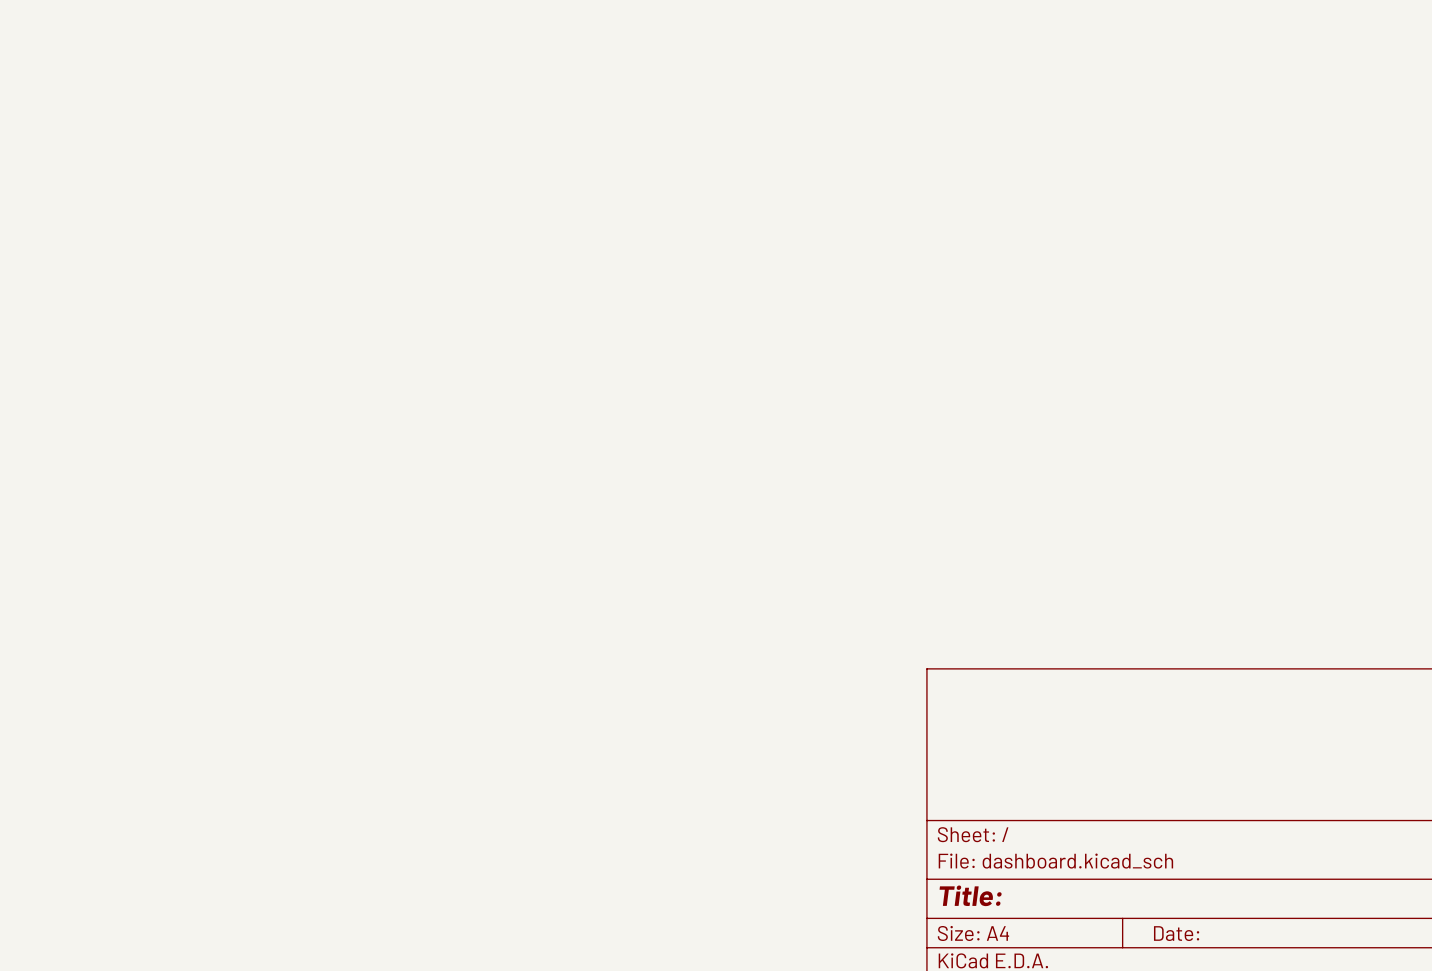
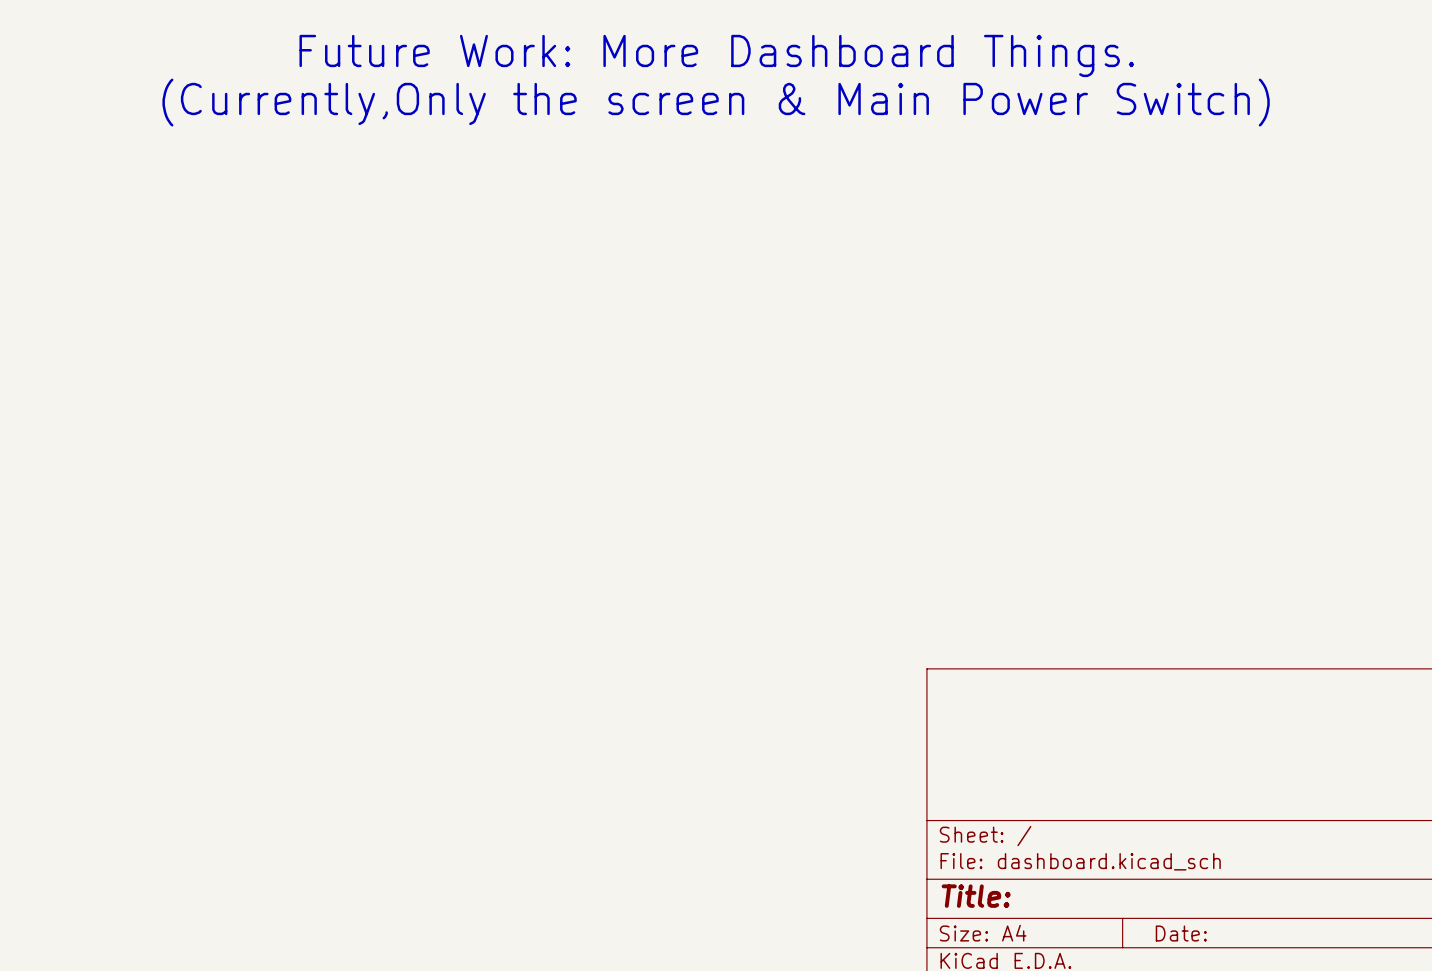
text: none -> Future Work: More Dashboard Things. (716, 55)
text: none -> (Currently,Only the screen & Main Power Switch) (716, 102)

